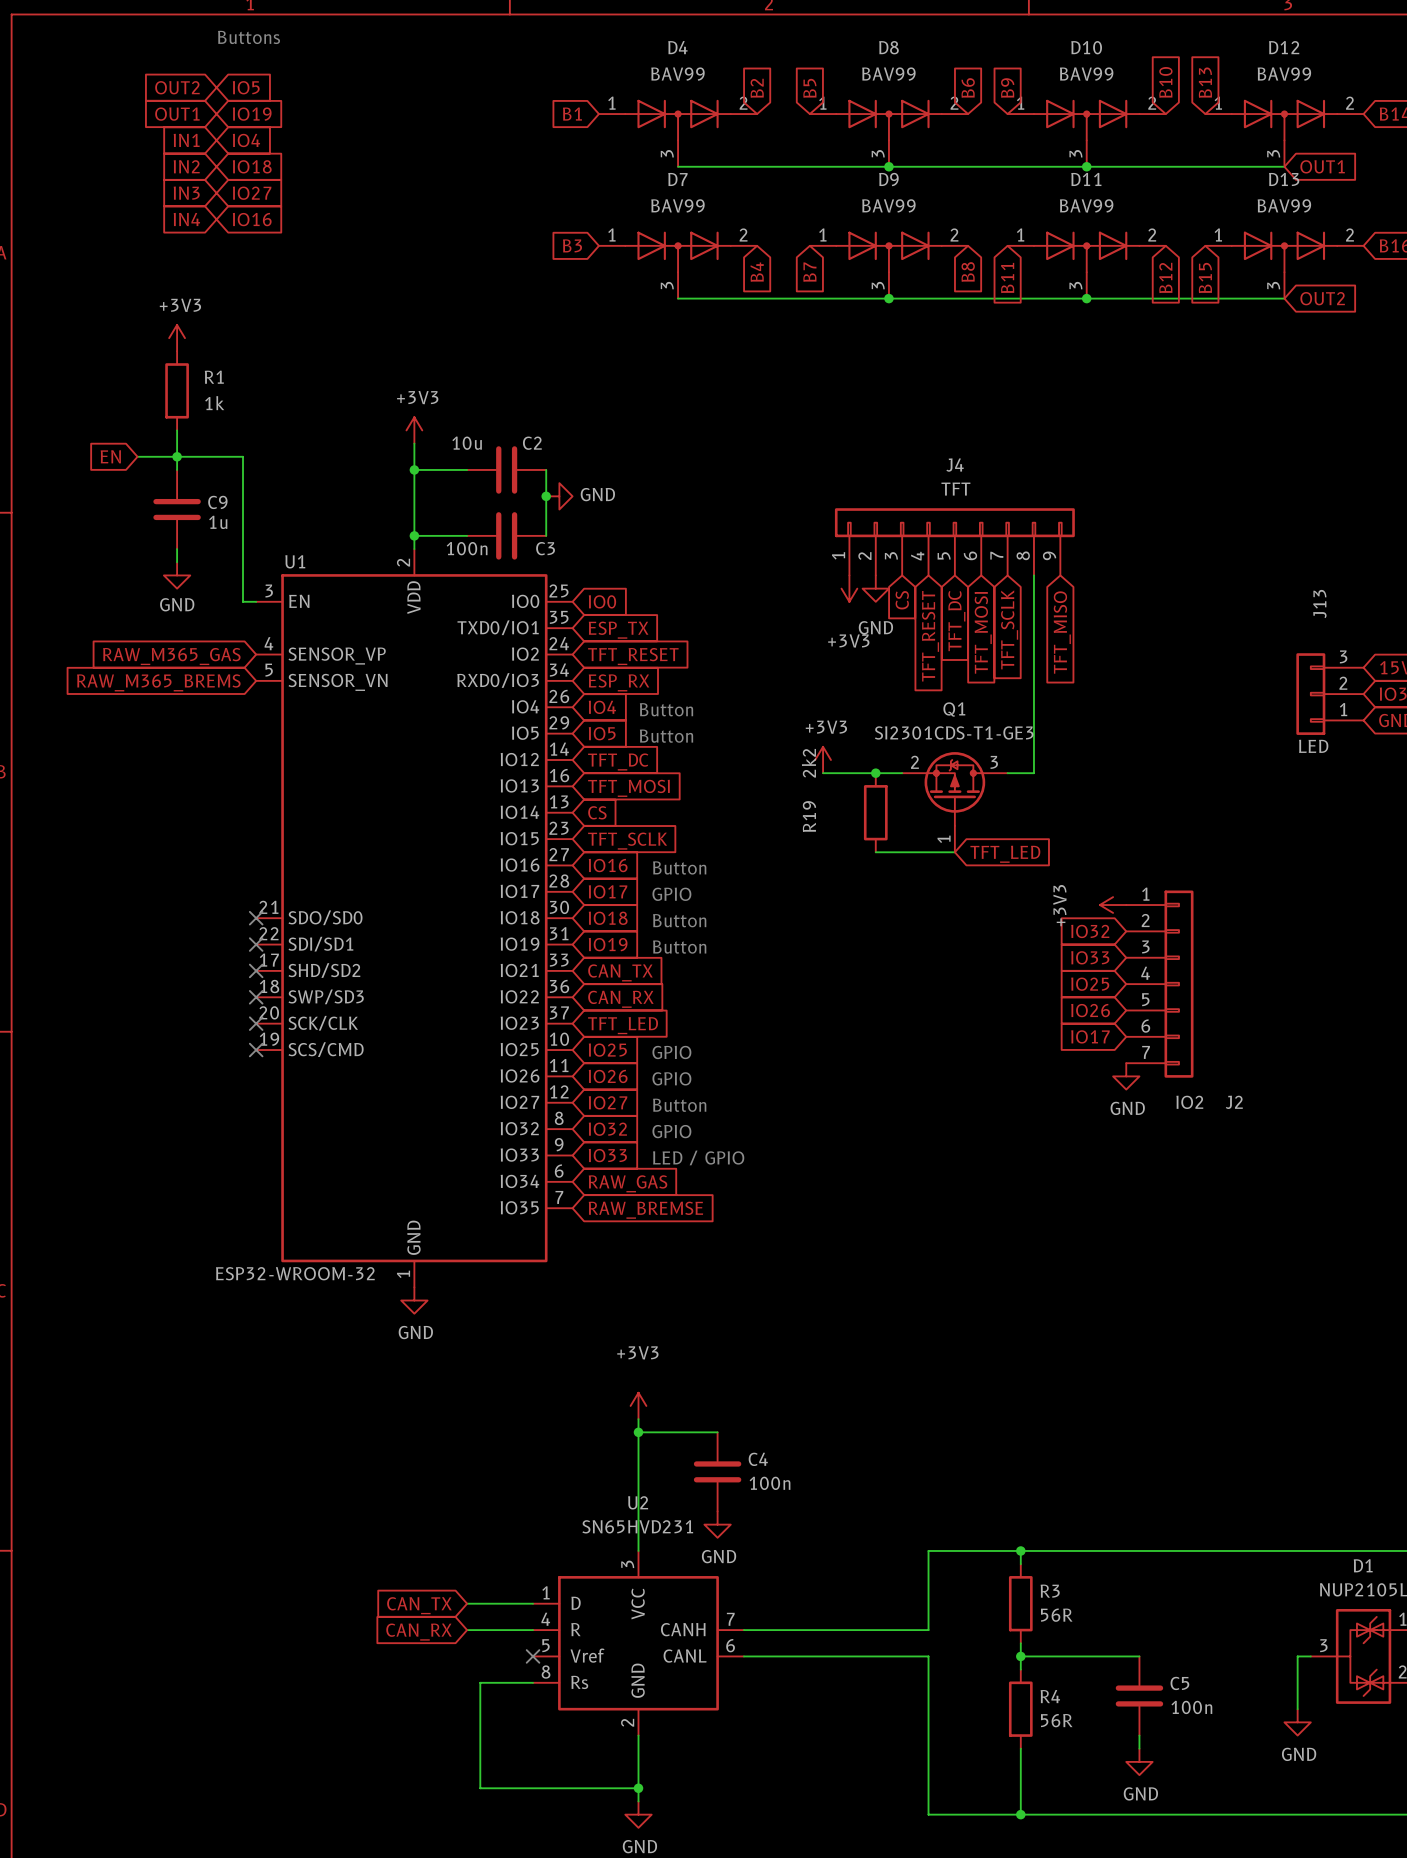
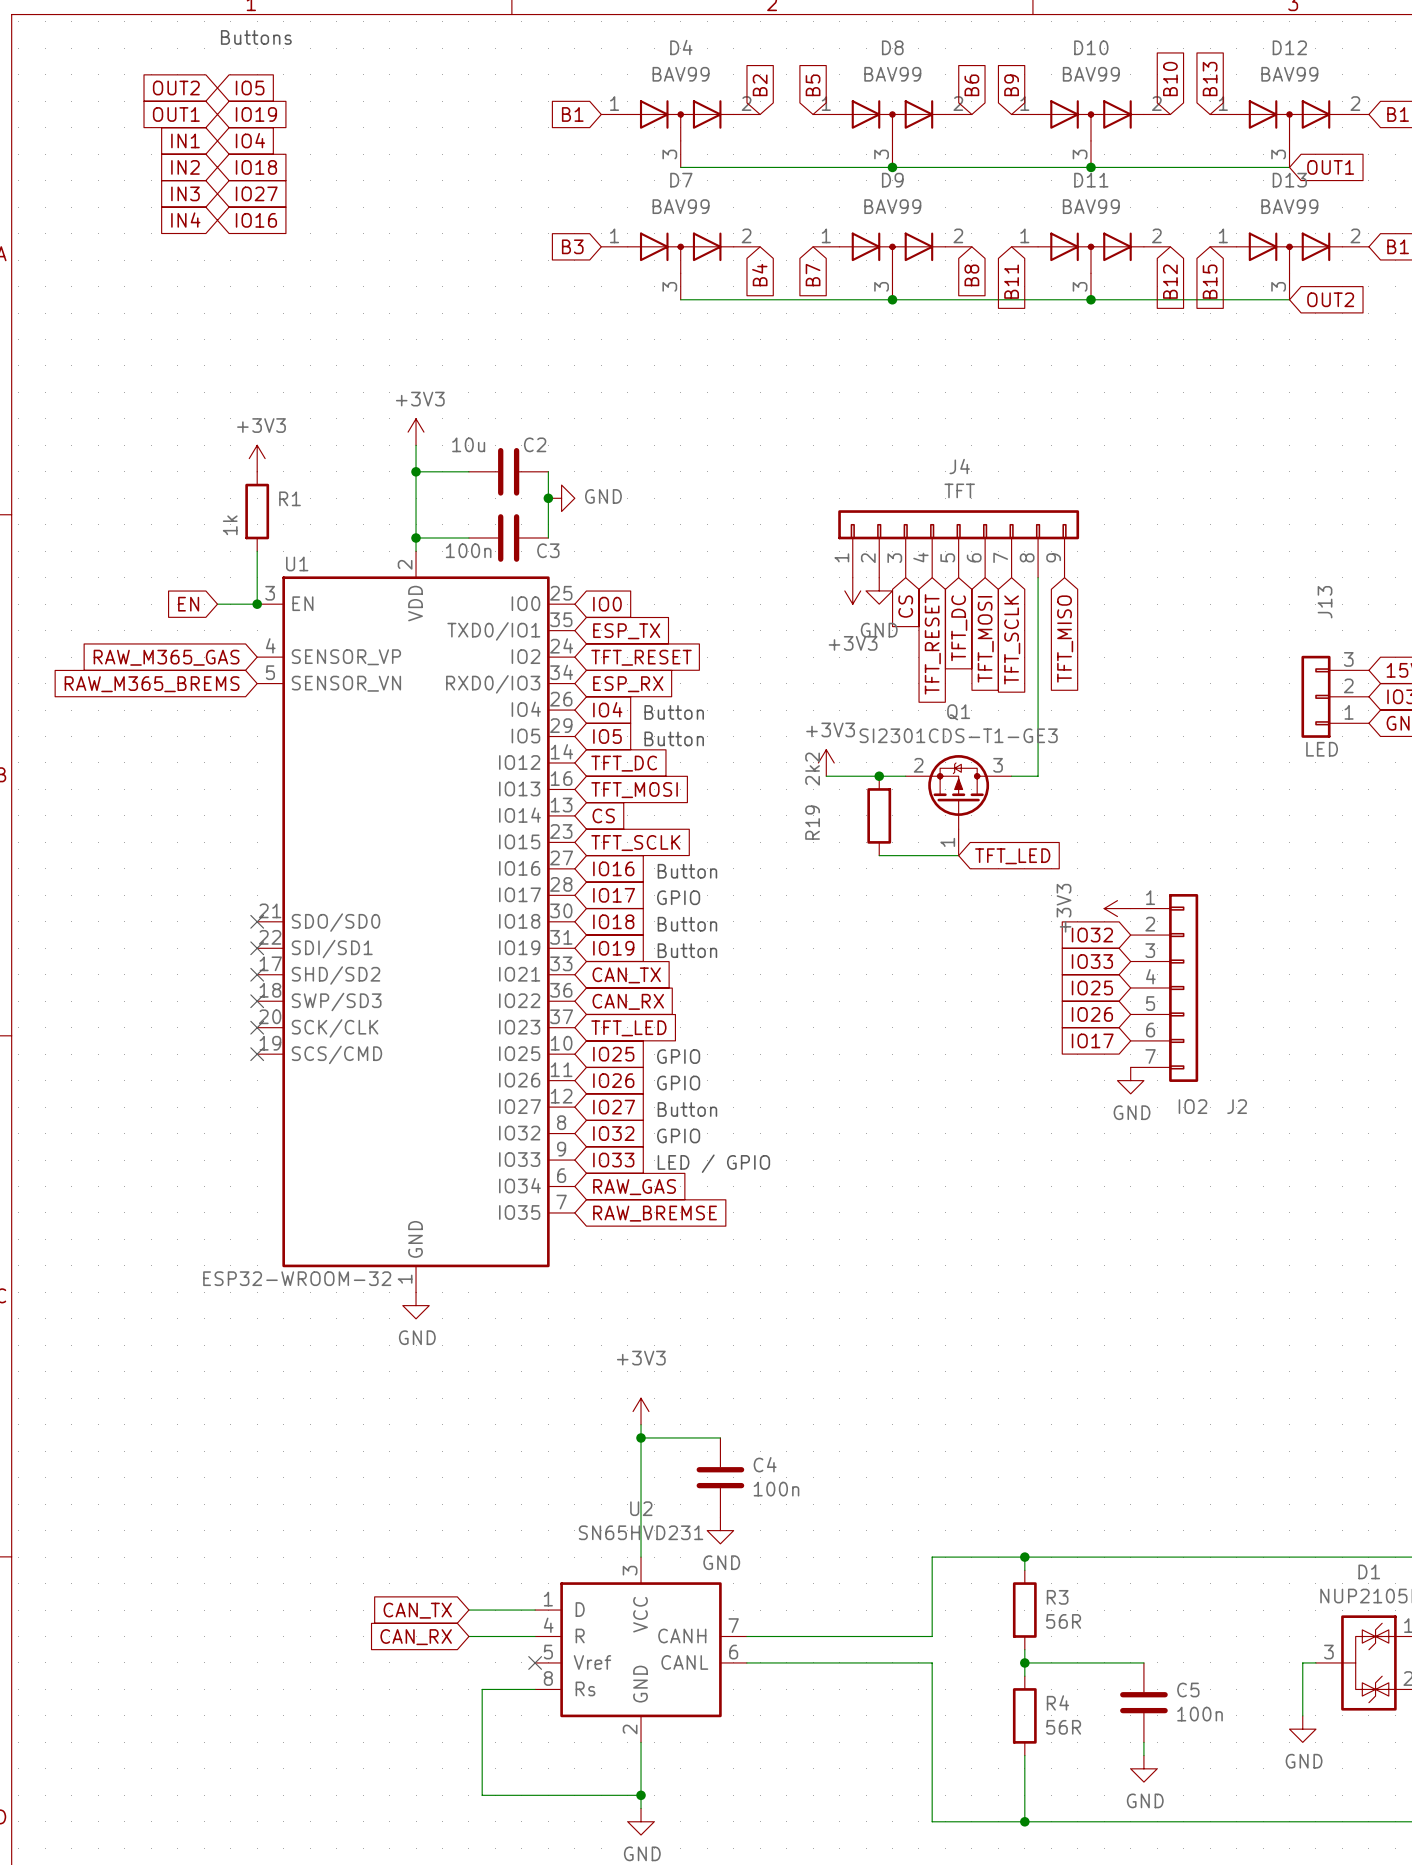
power symbol position: +3V3 (177, 338) -> +3V3 (257, 458)
R1 name position: R1 (214, 377) -> R1 (290, 498)
R1 position: (177, 390) -> (257, 511)
R1 value rotation: 0° (214, 403) -> 90° counterclockwise (230, 525)
R1 value position: 1k (214, 403) -> 1k (230, 525)
wire: (177, 430) (177, 469) -> none
global label position: EN (110, 456) -> EN (188, 604)
wire: (137, 456) (243, 456) (243, 601) -> (217, 604) (243, 604)
junction: (177, 456) -> none
C9: 1u (177, 509) -> none
wire: (177, 549) (177, 562) -> none
wire: none -> (257, 551) (257, 604)
power symbol: GND (177, 575) -> none
junction: none -> (257, 604)

